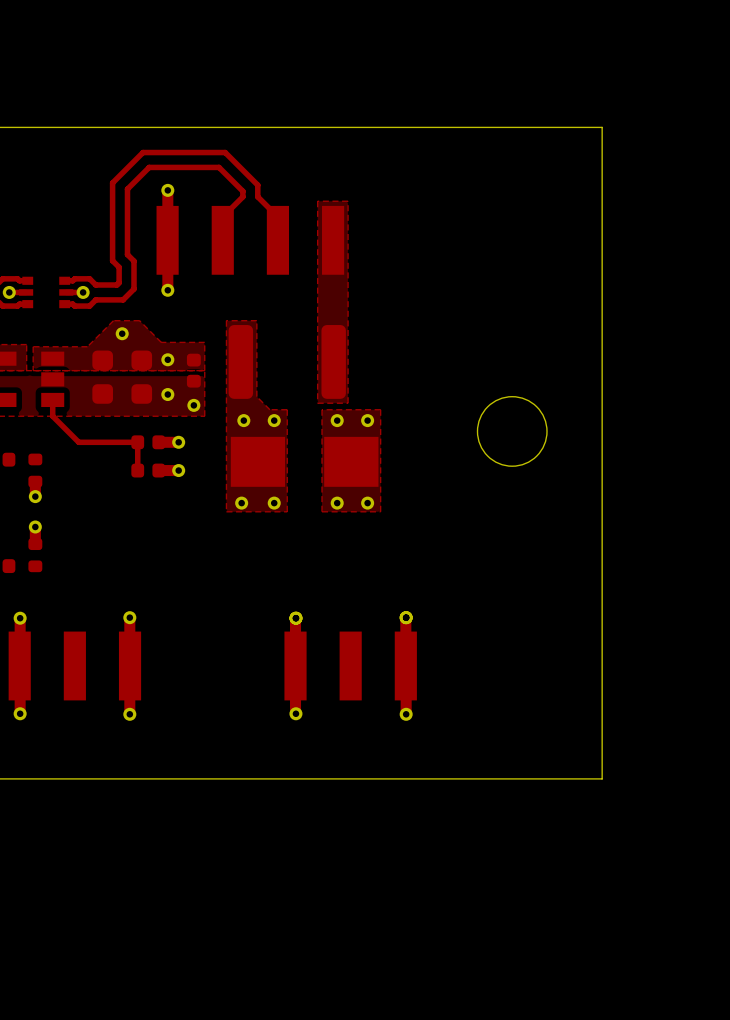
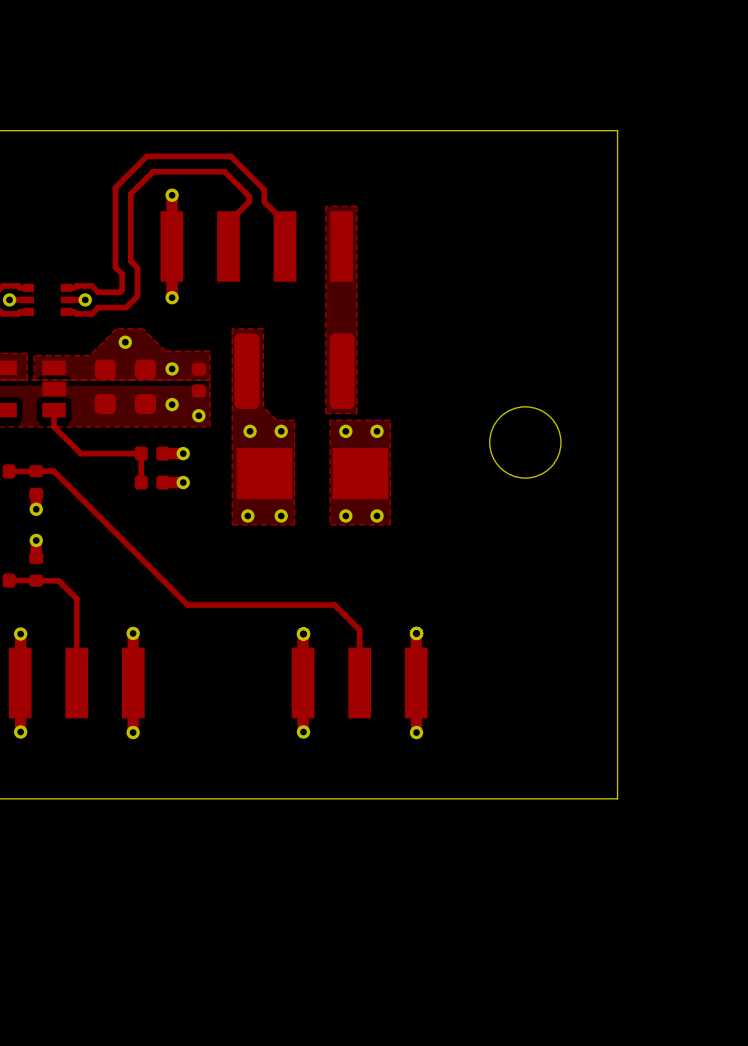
top track: none -> (36, 471) (53, 471) (187, 605) (334, 605) (359, 629) (359, 683)
top track: none -> (36, 471) (9, 471)
top track: none -> (36, 580) (9, 580)
top track: none -> (36, 580) (58, 580) (76, 598) (76, 683)

